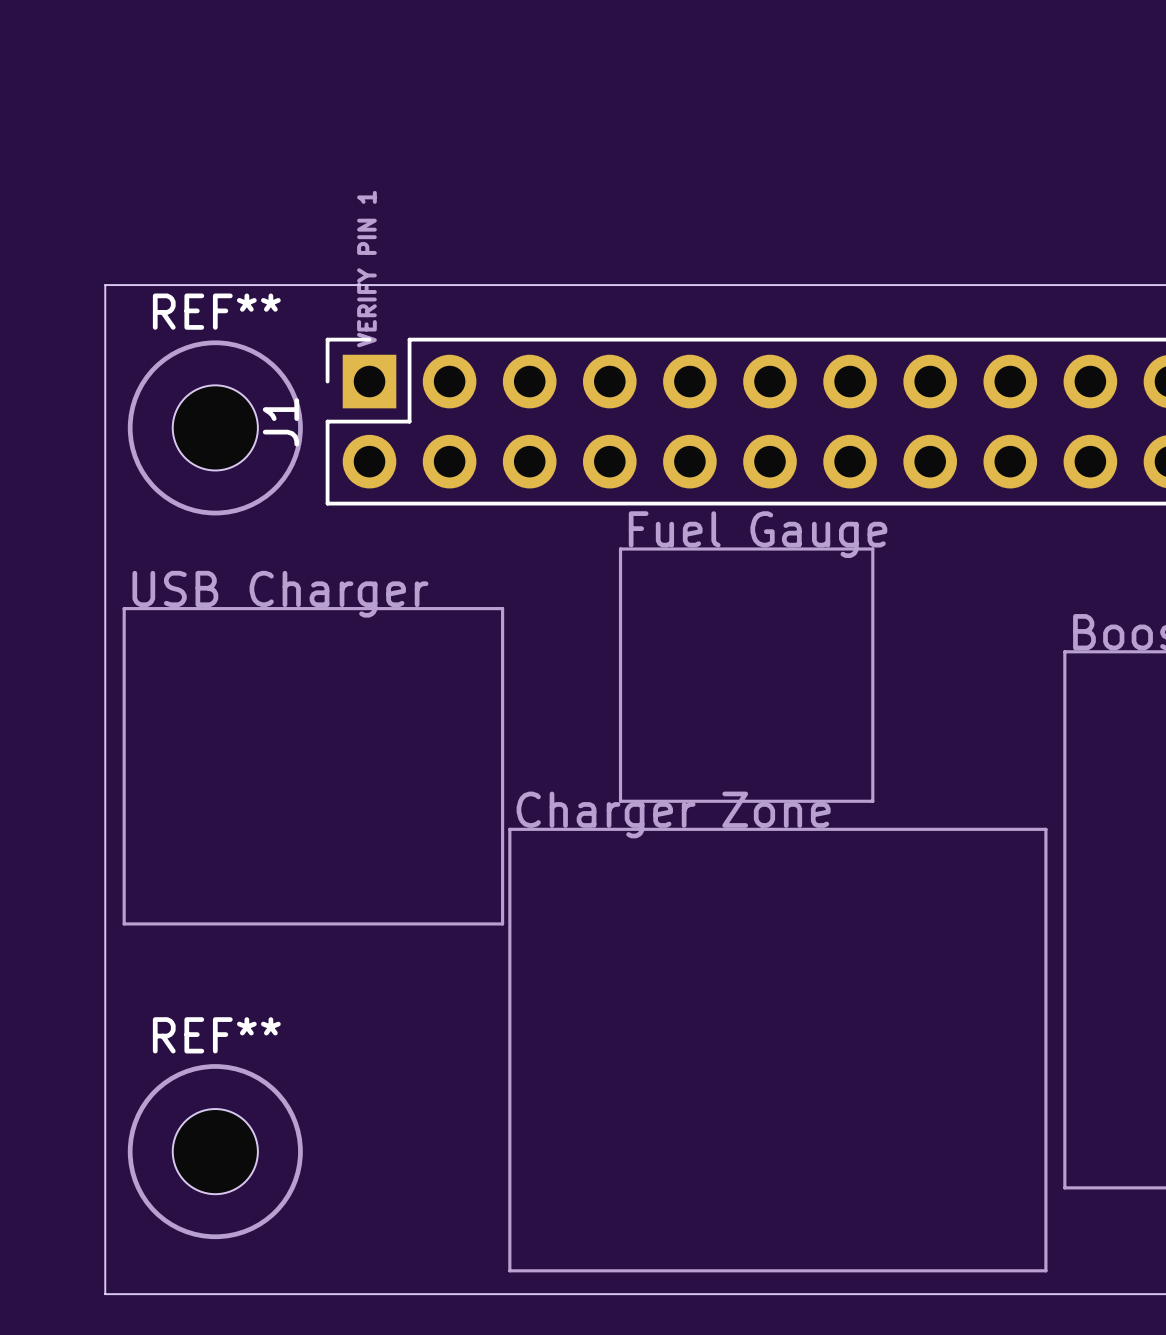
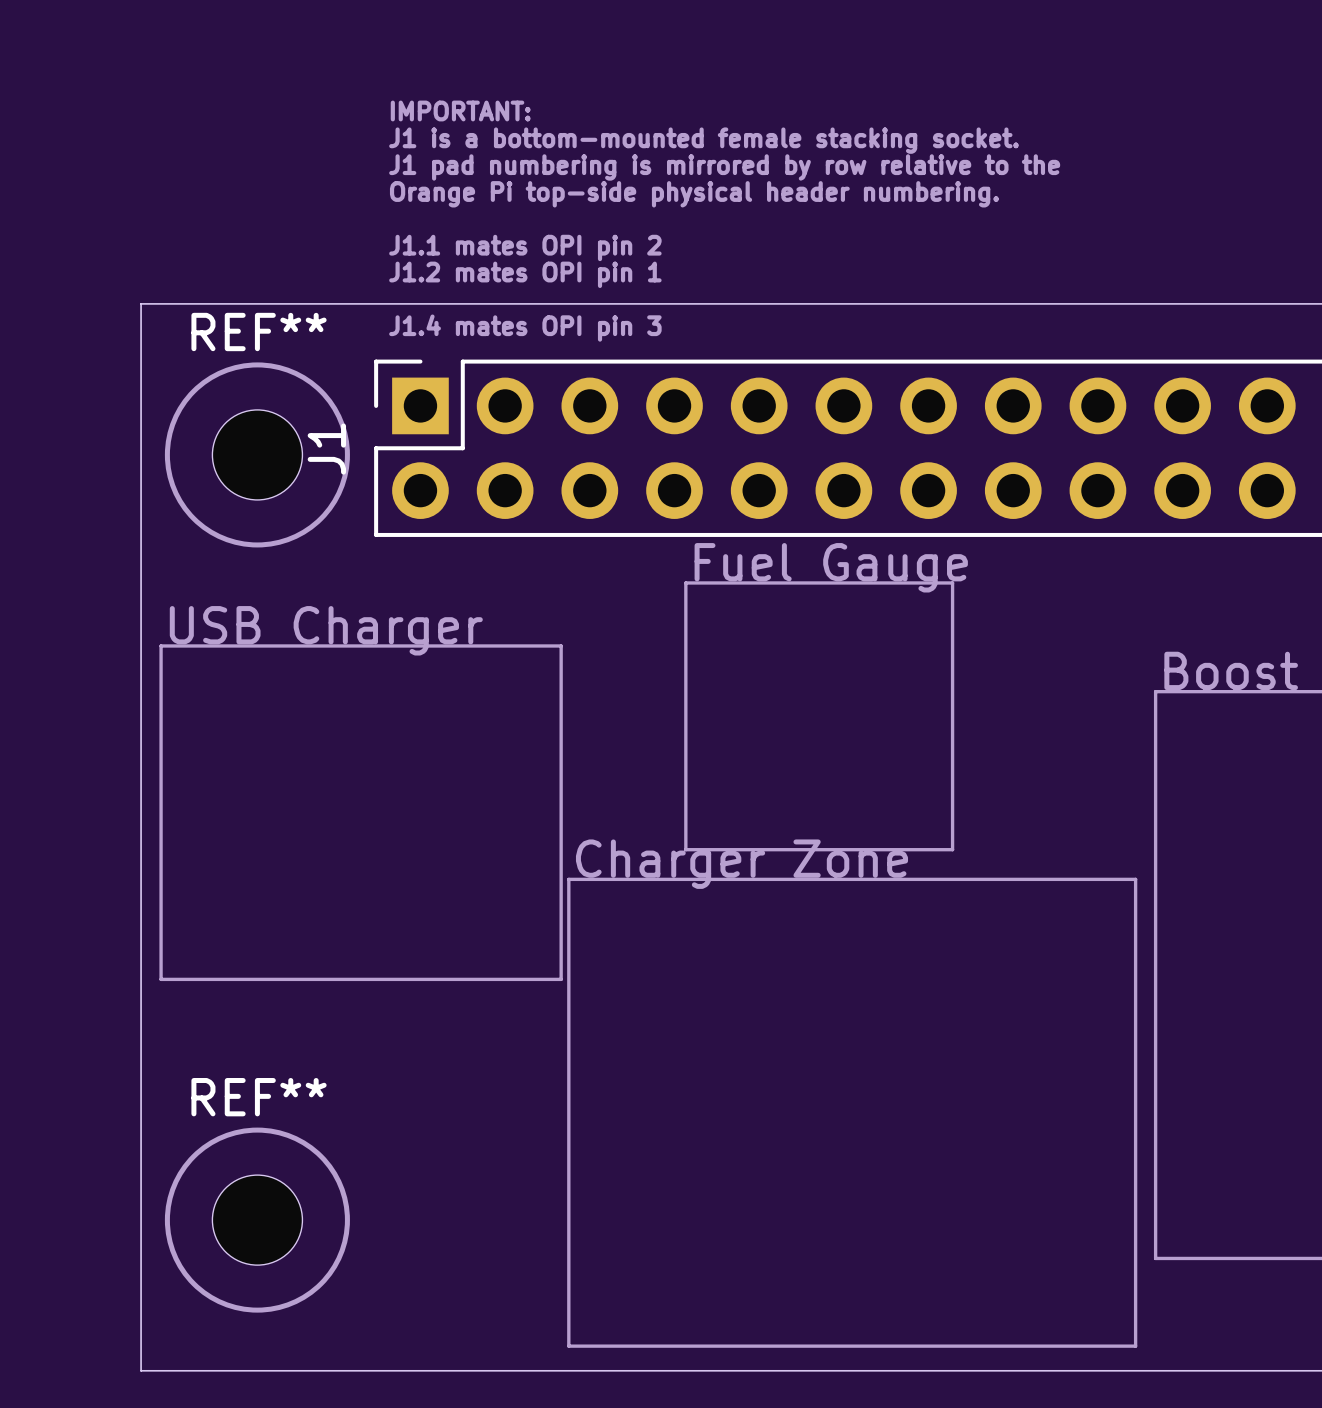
text: none -> IMPORTANT: (460, 110)
text: none -> J1 is a bottom-mounted female stacking socket. (704, 140)
text: none -> J1 pad numbering is mirrored by row relative to the (724, 167)
text: none -> Orange Pi top-side physical header numbering. (694, 194)
text: none -> J1.1 mates OPI pin 2 (525, 247)
text: none -> J1.2 mates OPI pin 1 (525, 274)
text: VERIFY PIN 1 (366, 269) -> none
text: none -> J1.4 mates OPI pin 3 (525, 328)

